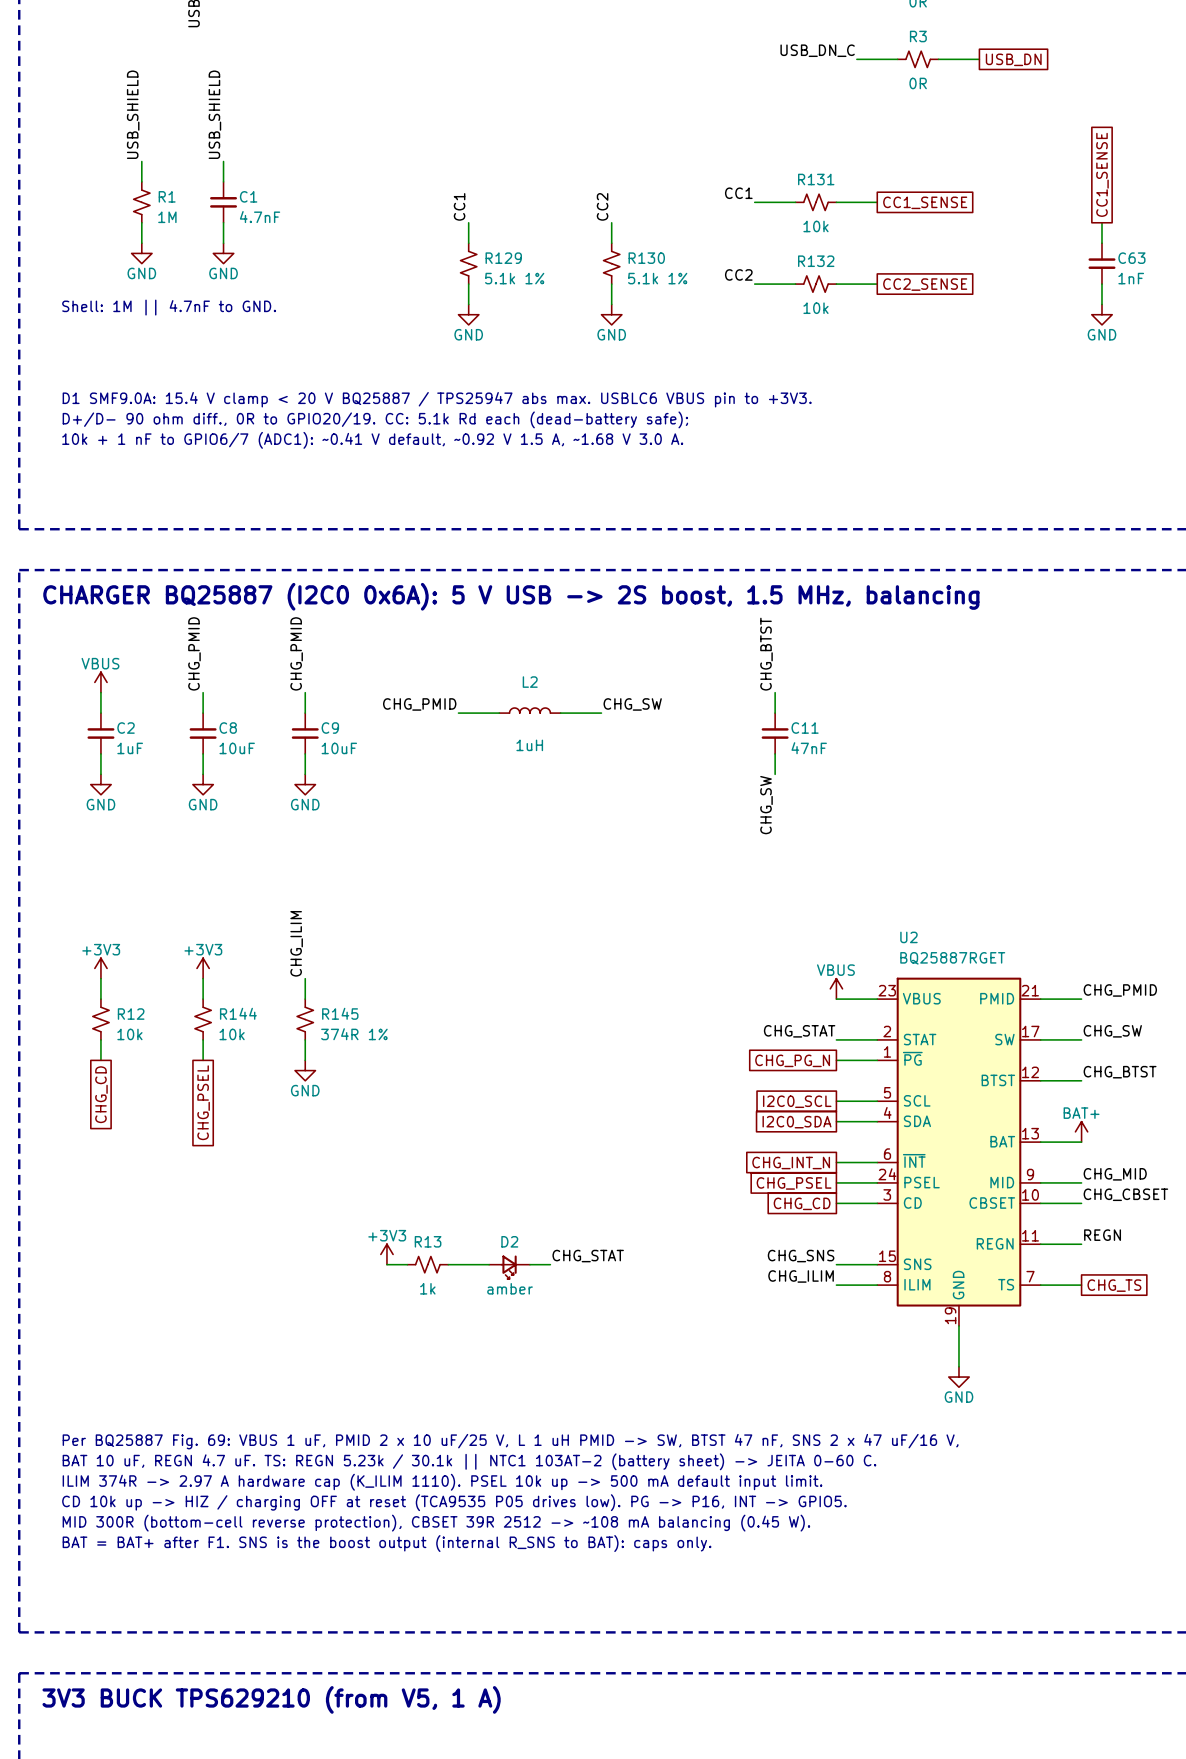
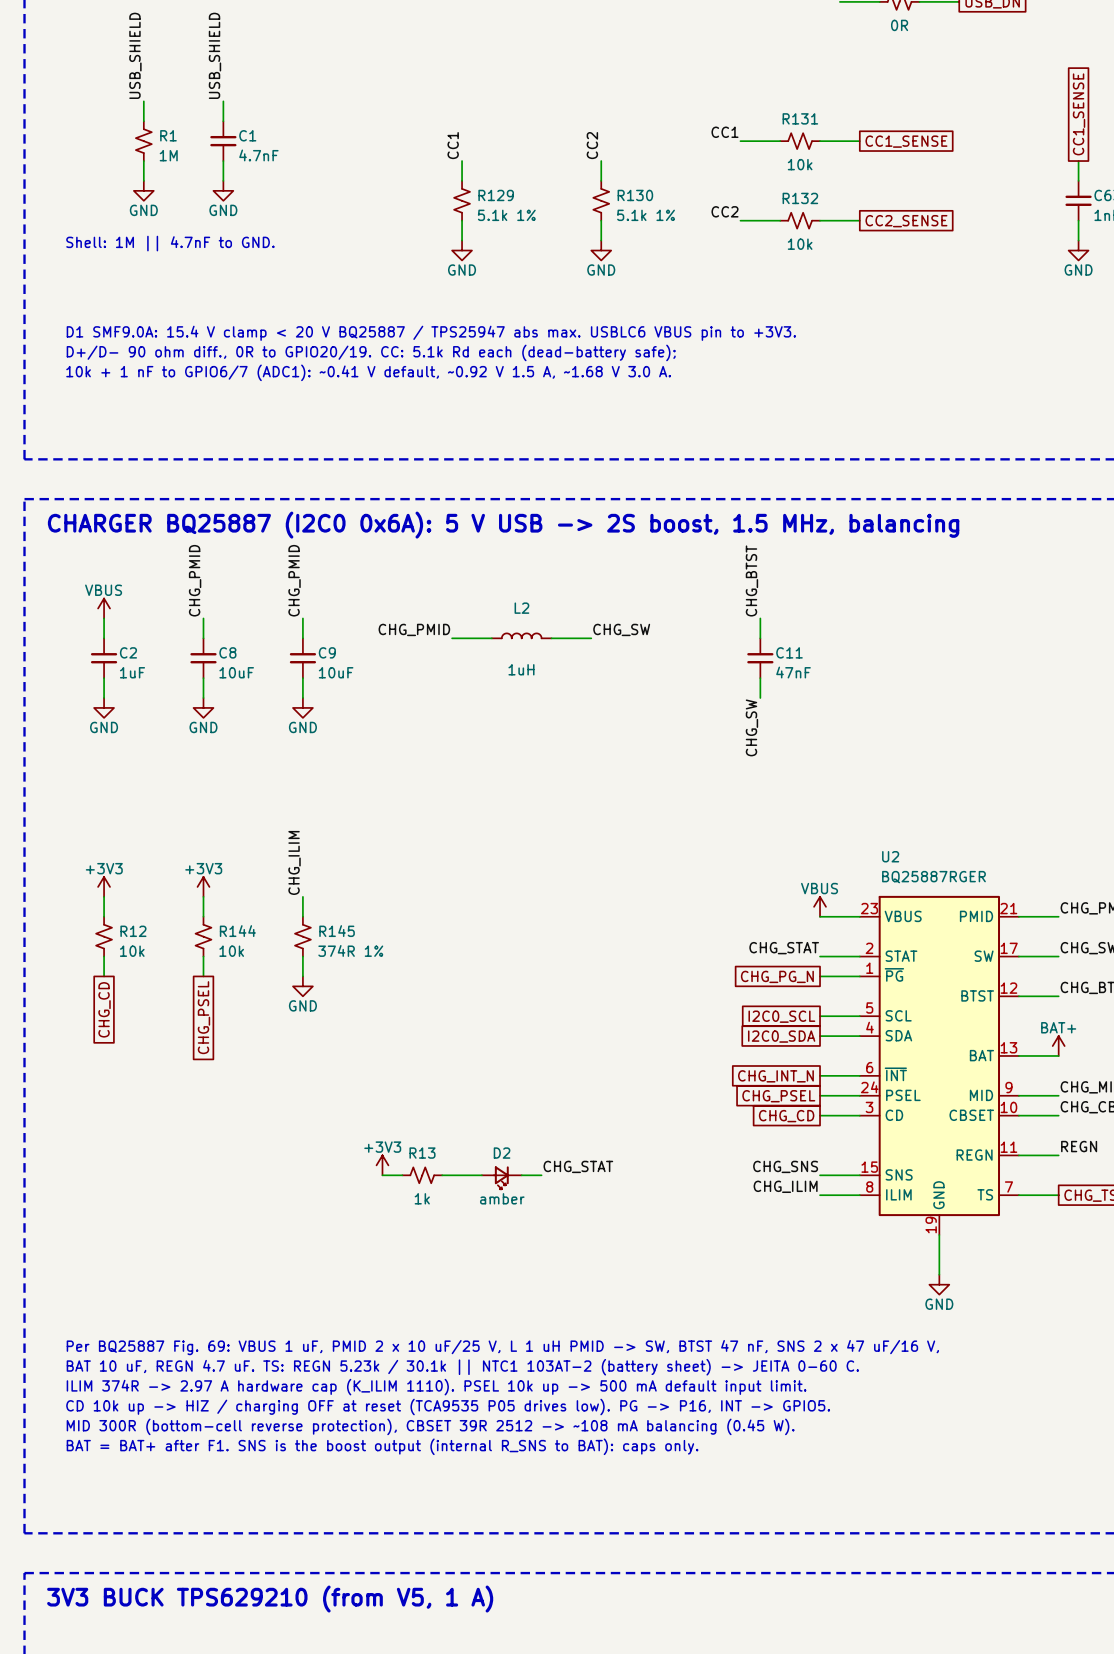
U2 value: BQ25887RGET (952, 958) -> BQ25887RGER (933, 877)

